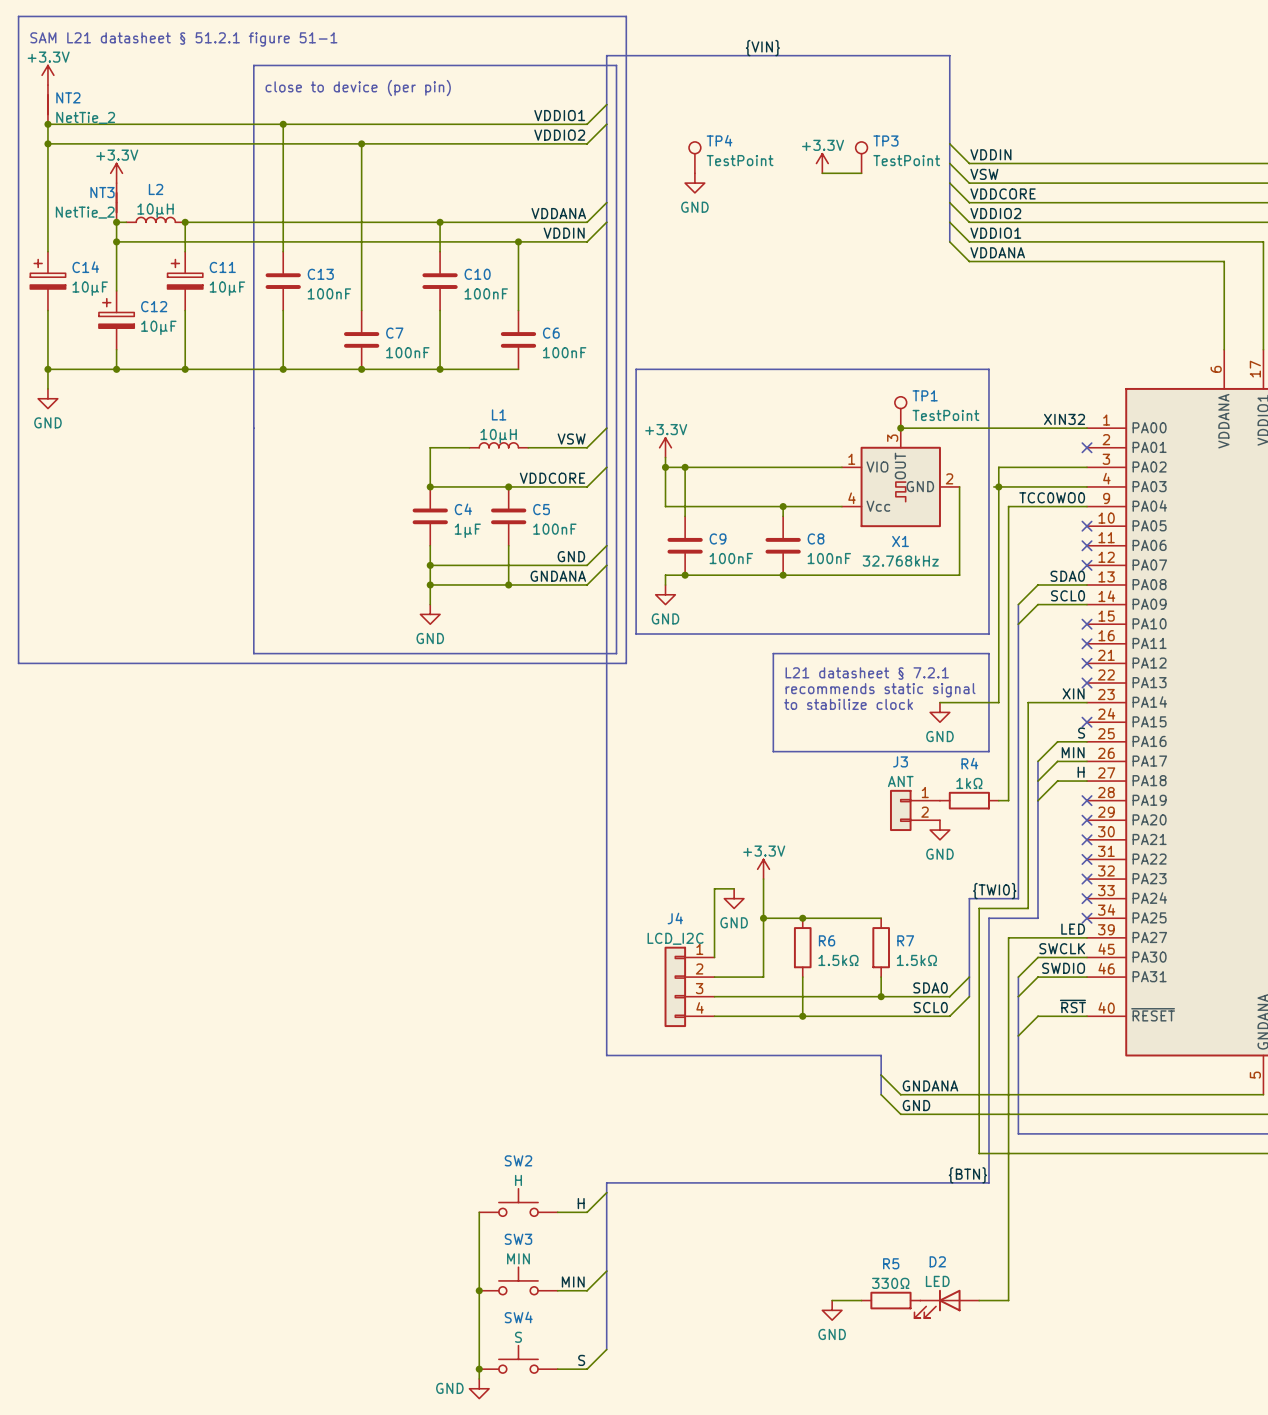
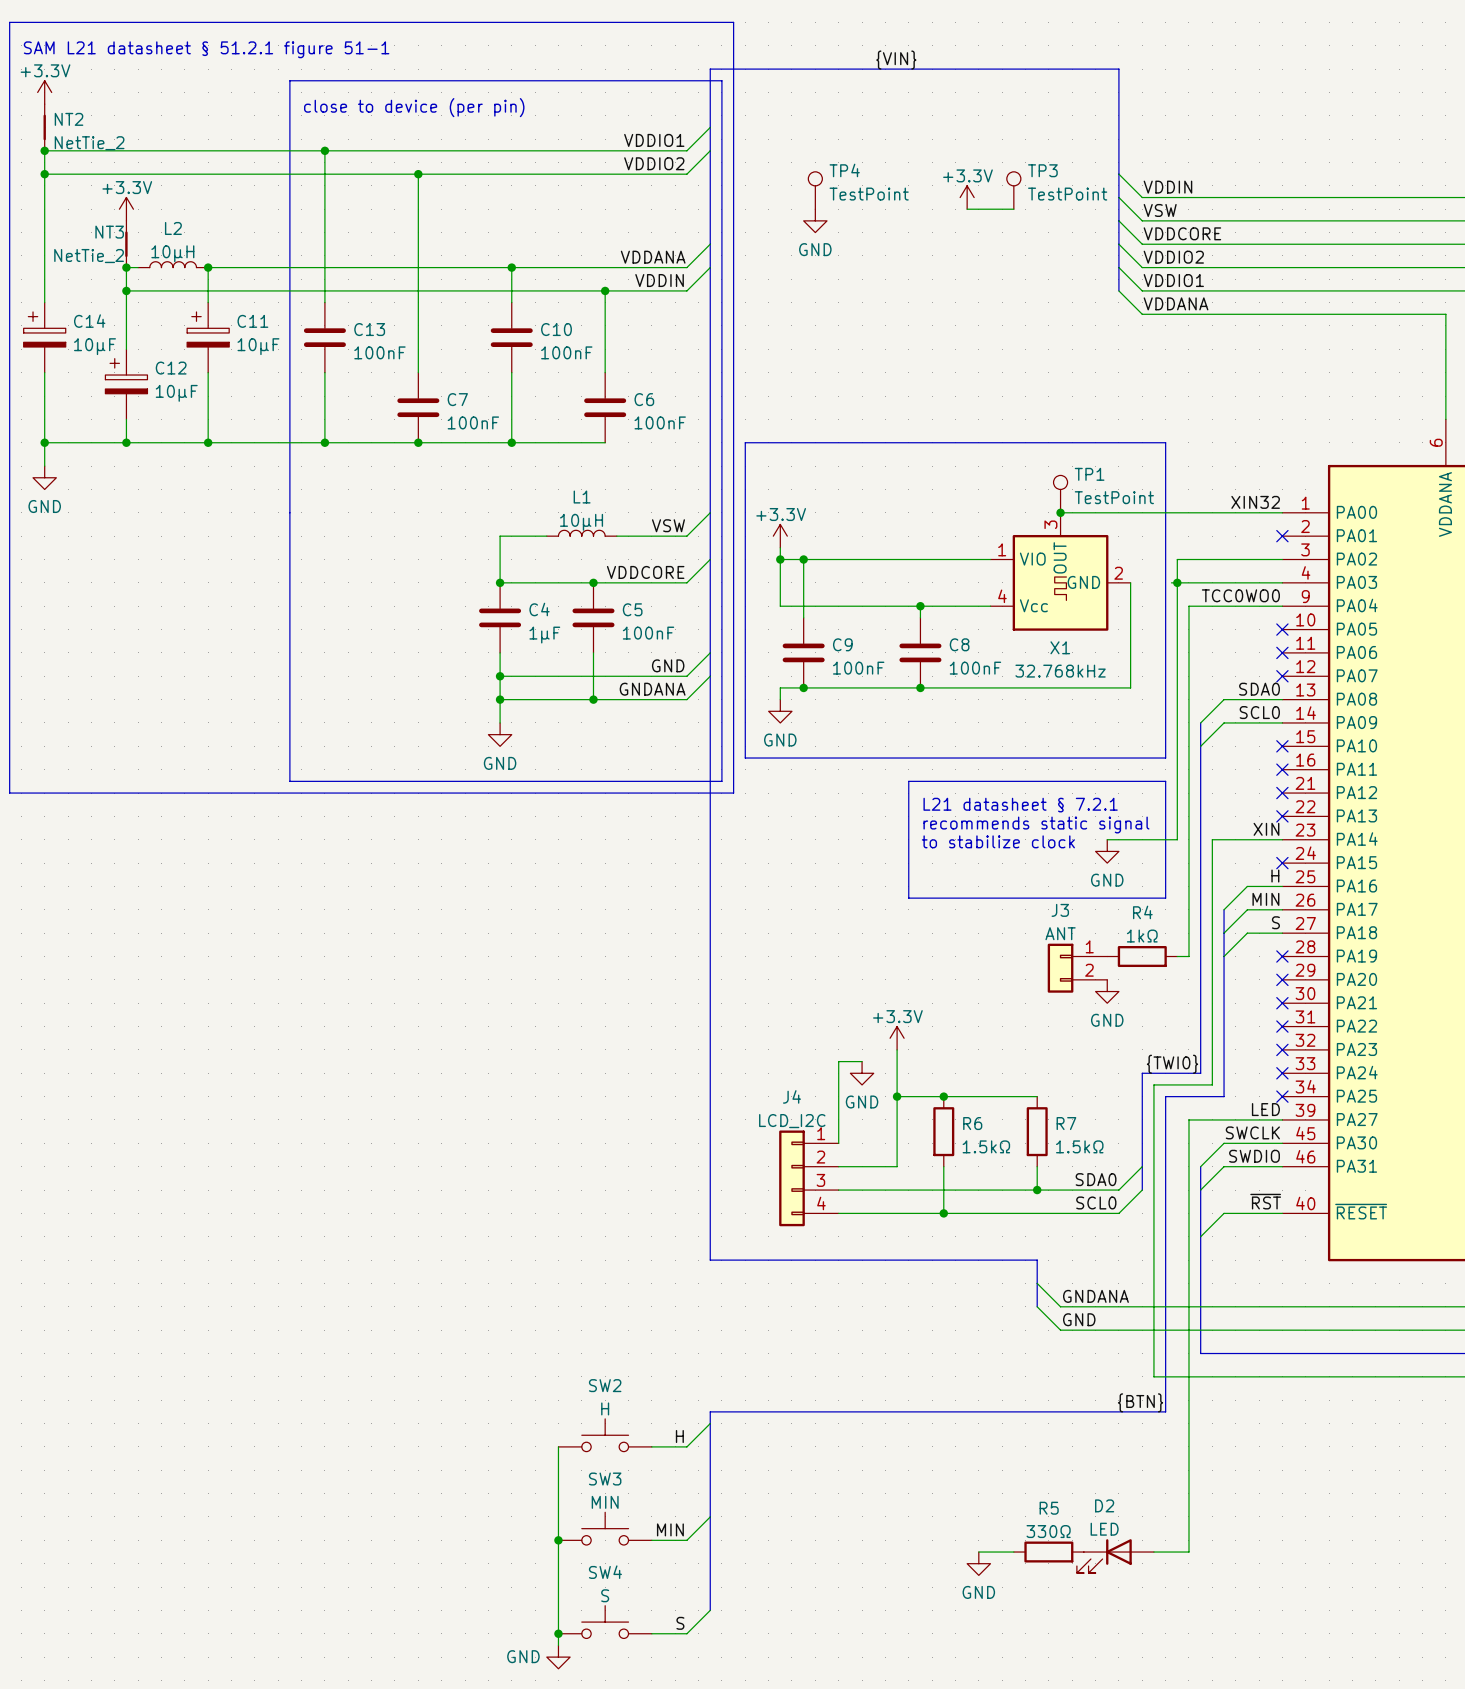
label: S (1081, 733) -> H (1275, 876)
label: H (1081, 772) -> S (1275, 922)

